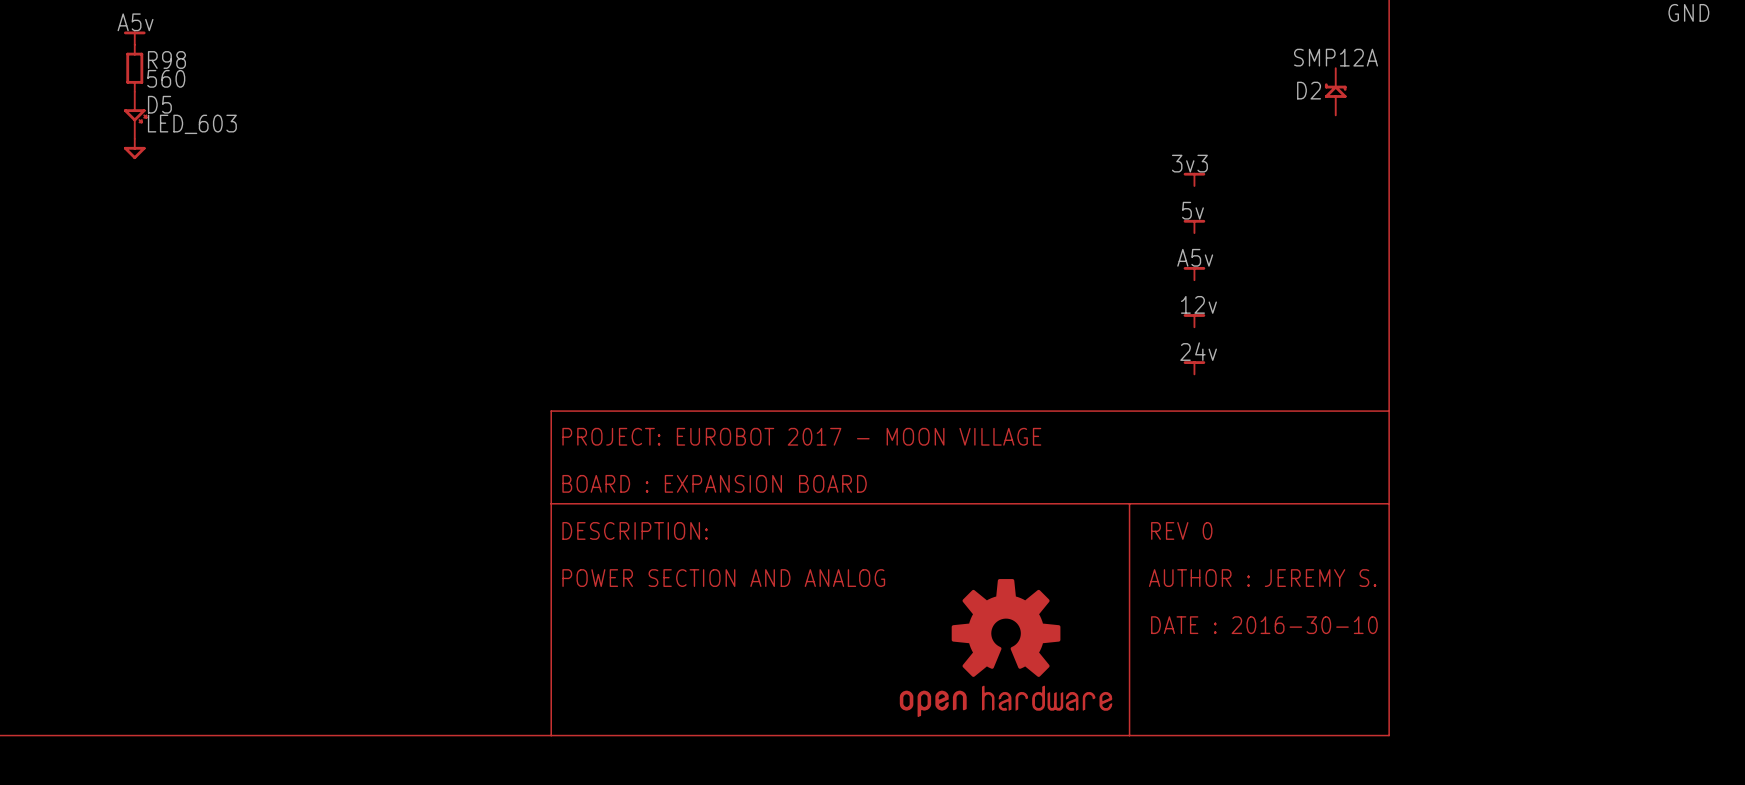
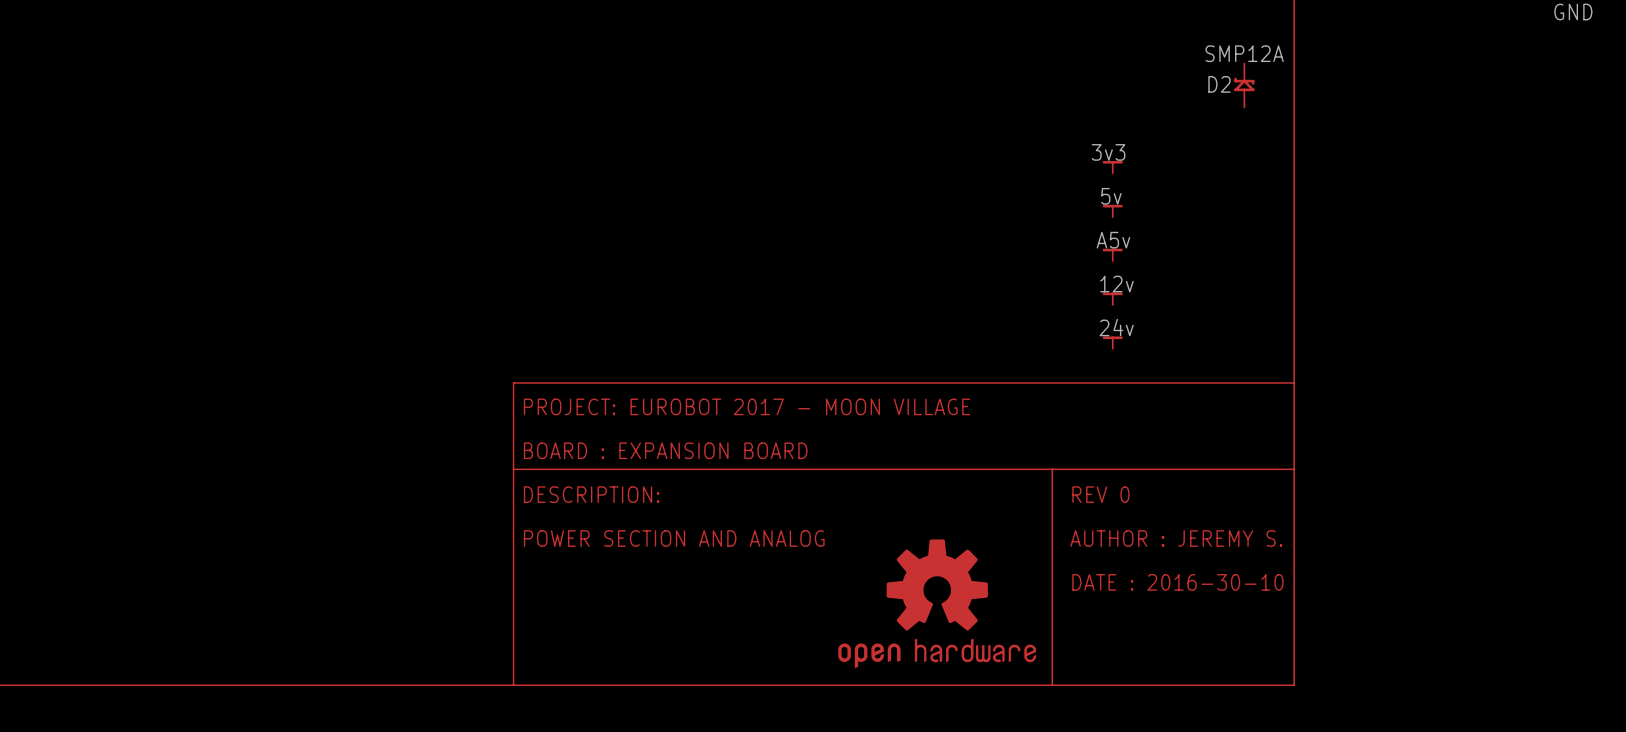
power symbol: (134, 38) -> none
R98: 560 (134, 68) -> none
D5: LED_603 (135, 115) -> none
power symbol: (134, 148) -> none

